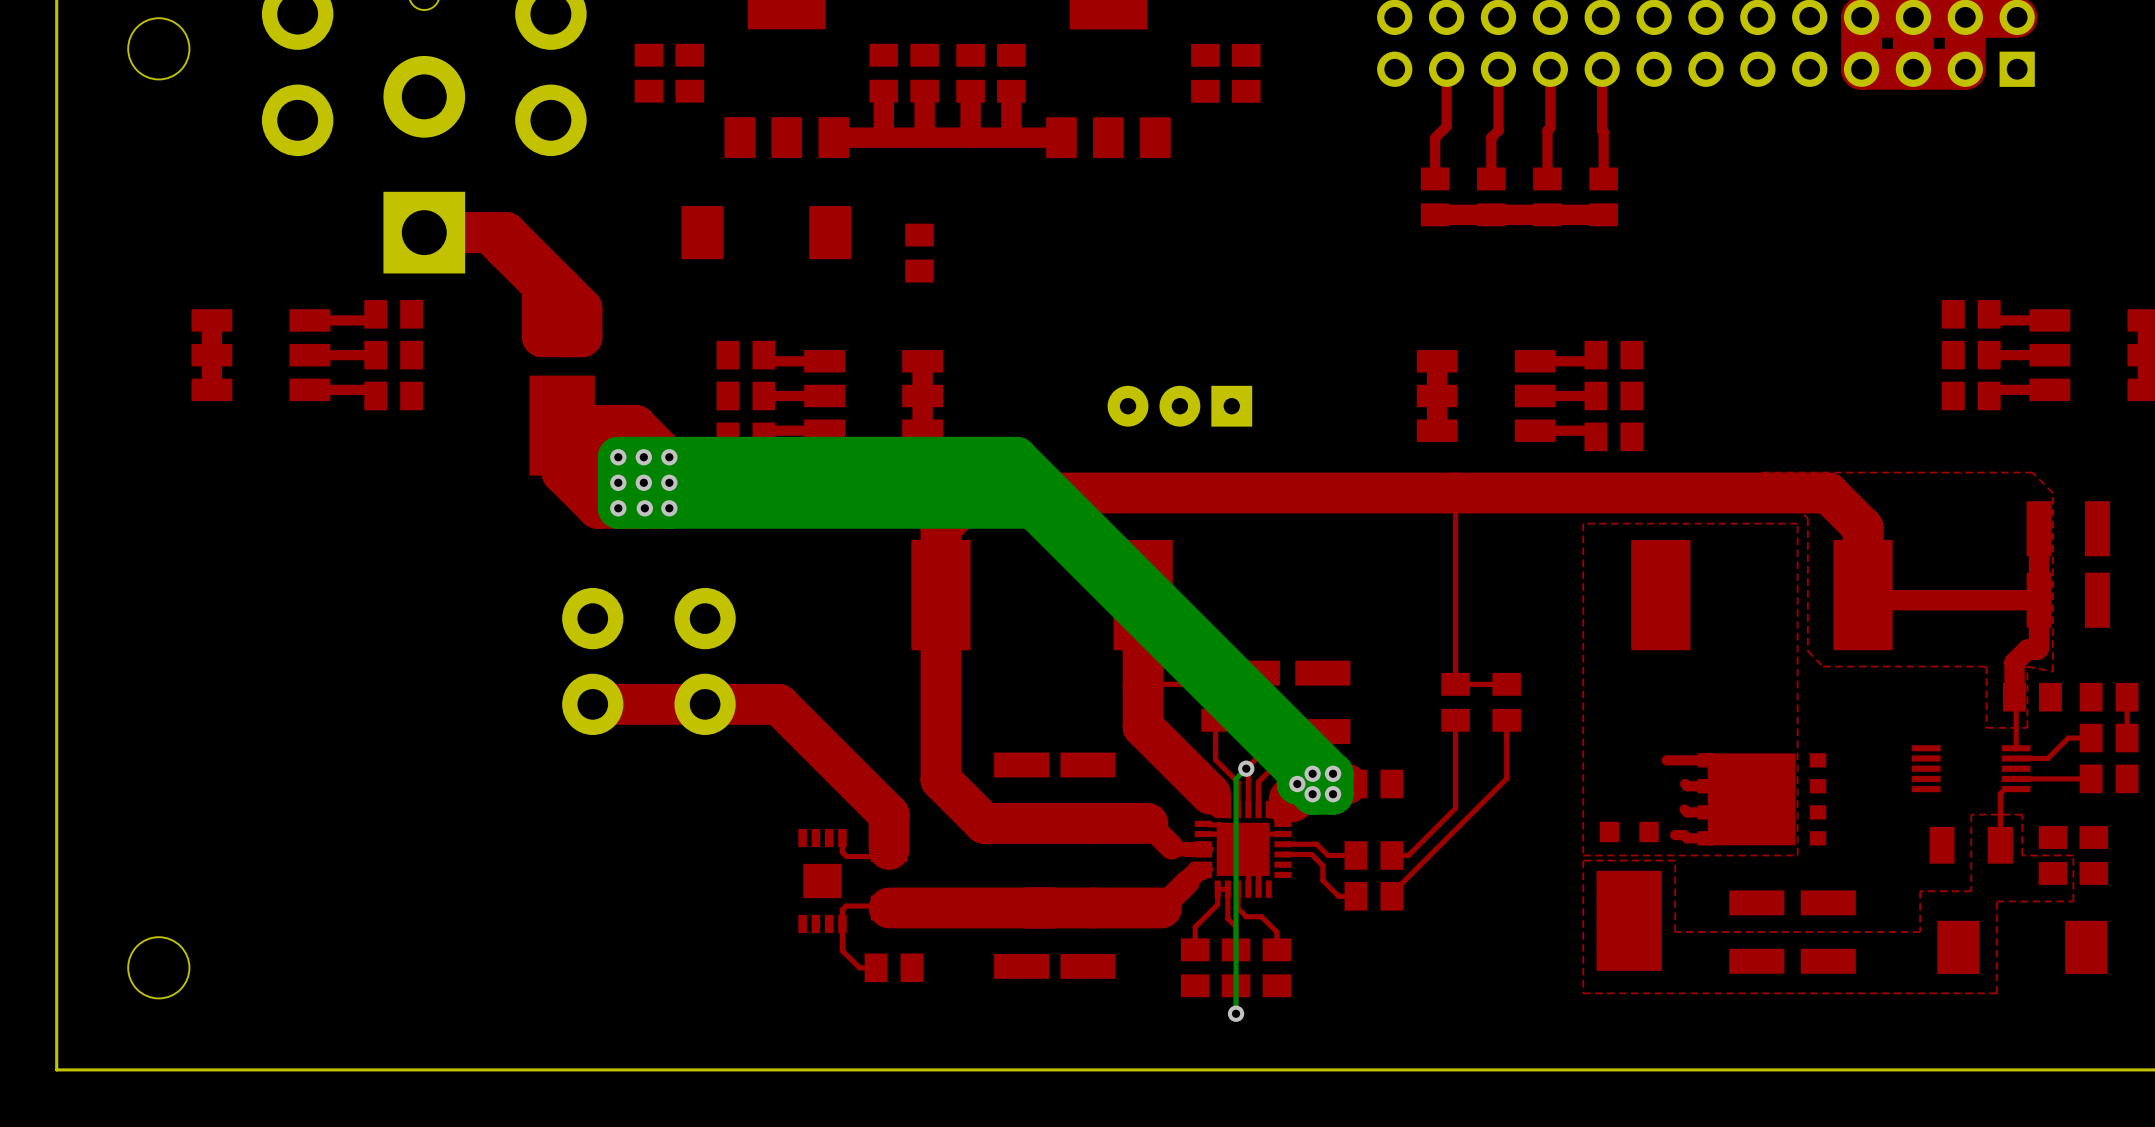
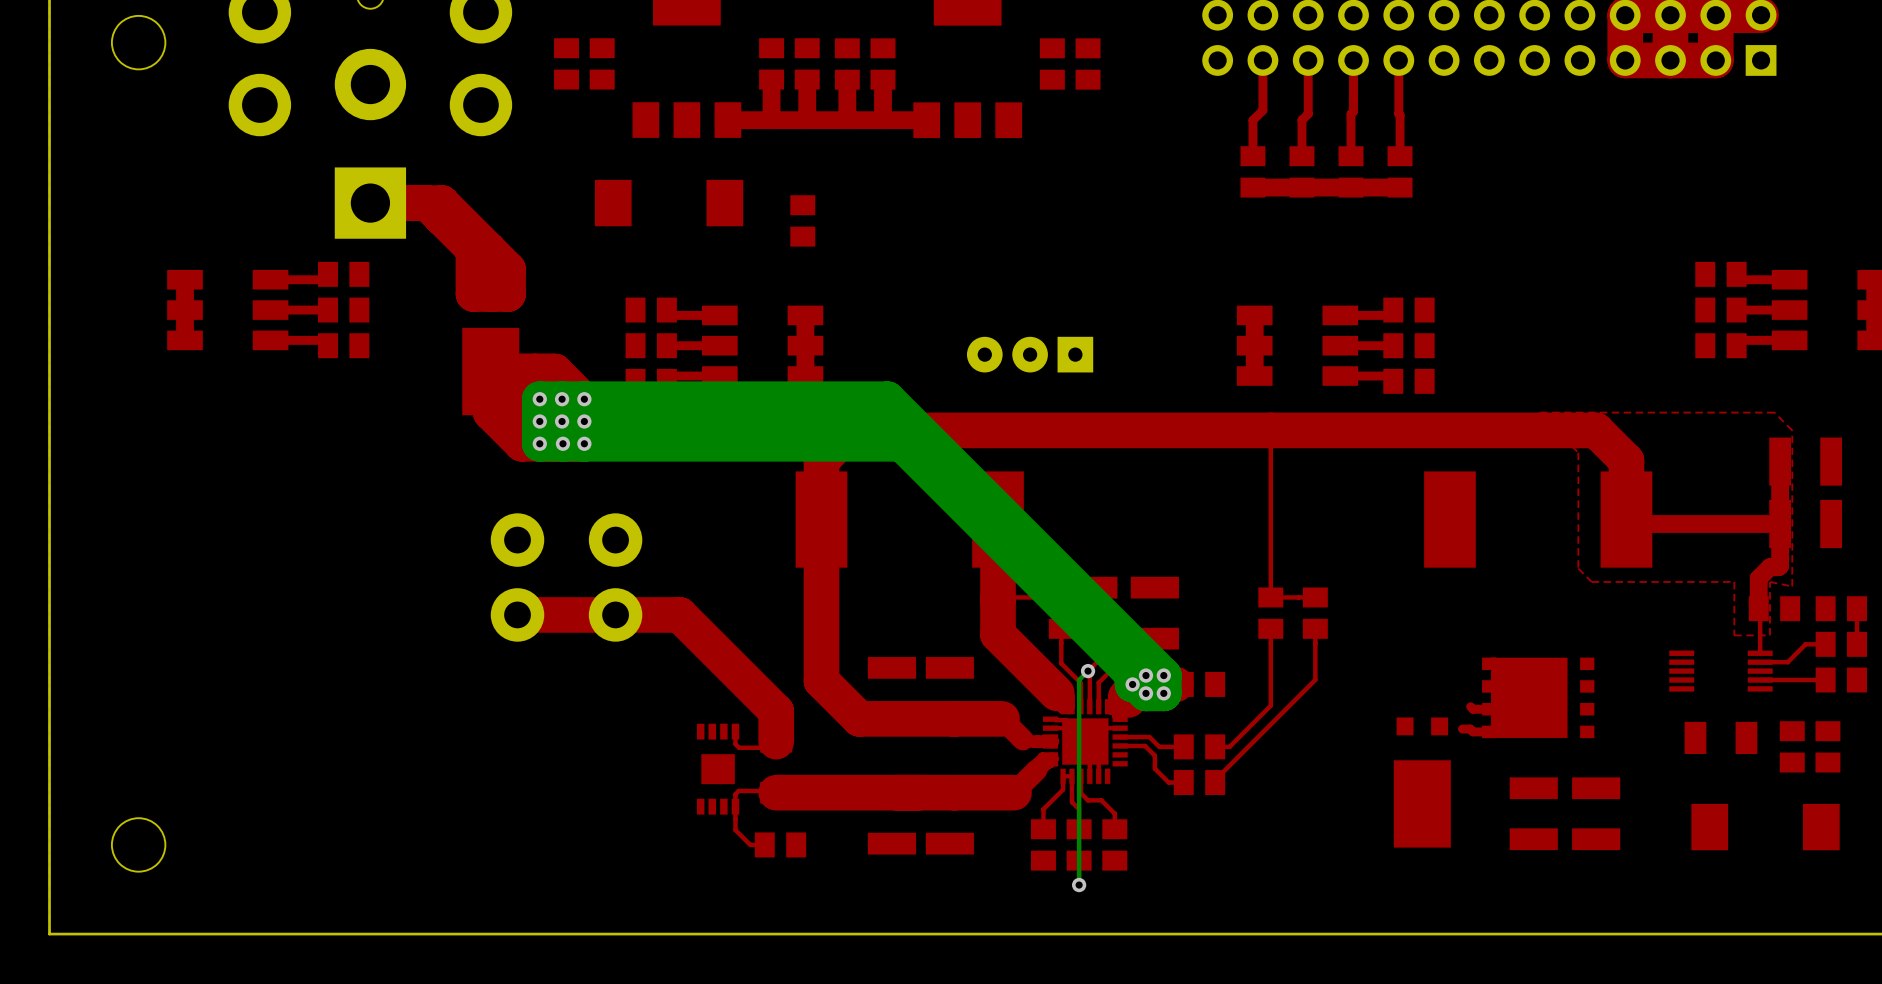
top zone outline: (1797, 523) (1583, 523) (1583, 855) (1797, 855) (1797, 523) -> none
top track: (1705, 760) (1666, 760) -> none
top track: (1685, 784) (1687, 786) (1705, 786) -> none
top track: (2016, 789) (2004, 789) (2000, 793) (2000, 845) -> none
top zone outline: (2022, 814) (2022, 855) (2073, 855) (2073, 901) (1996, 901) (1996, 993) (1583, 993) (1583, 860) (1675, 860) (1675, 932) (1920, 932) (1920, 891) (1971, 891) (1971, 814) (2022, 814) -> none

